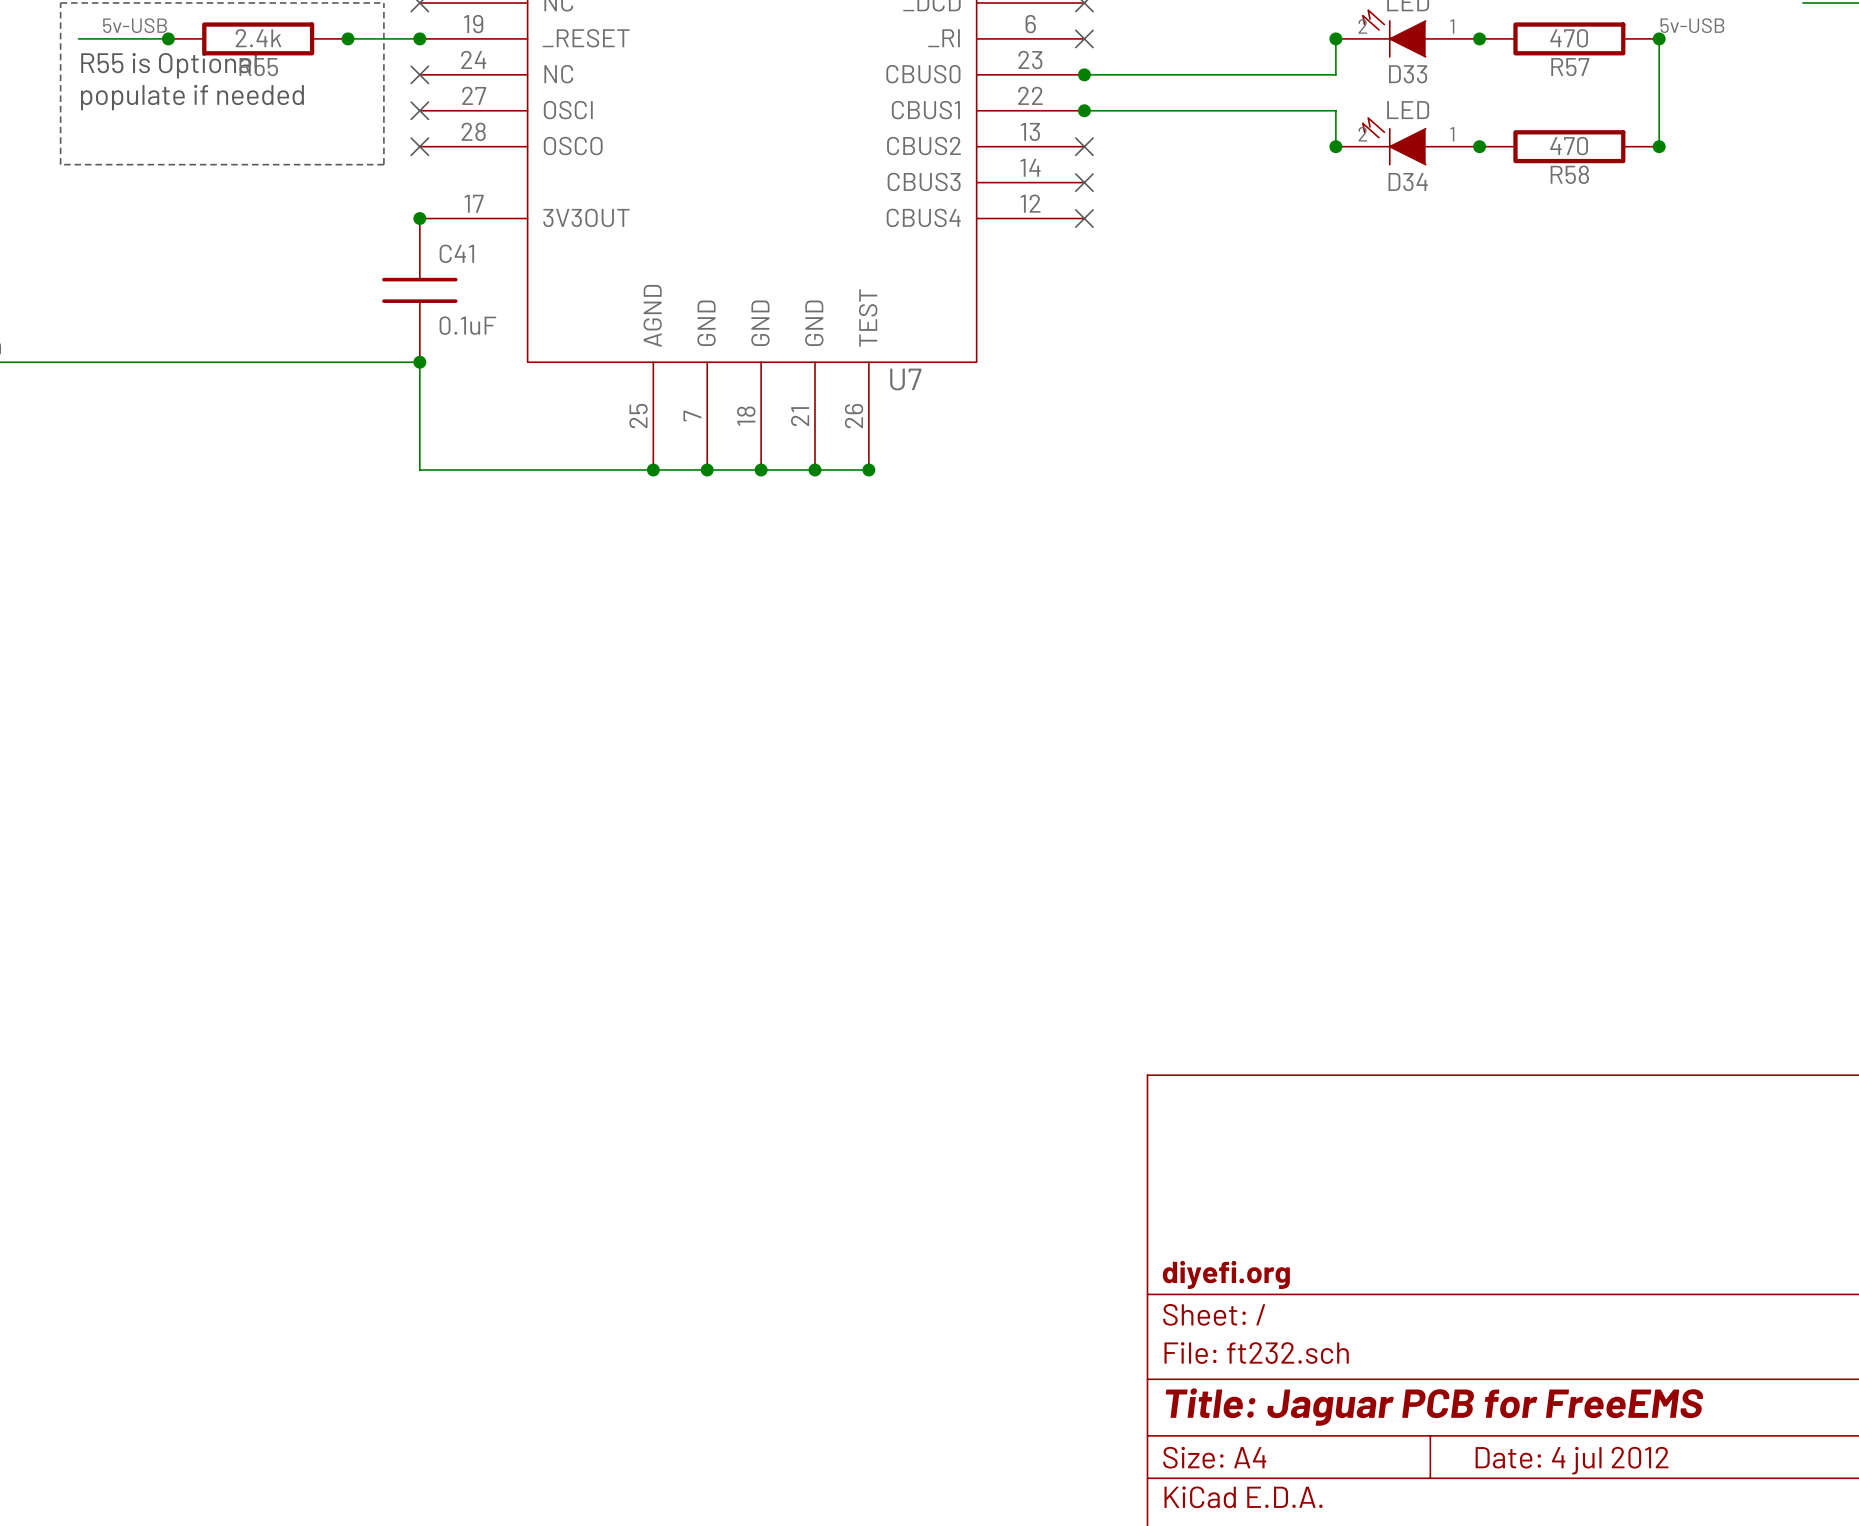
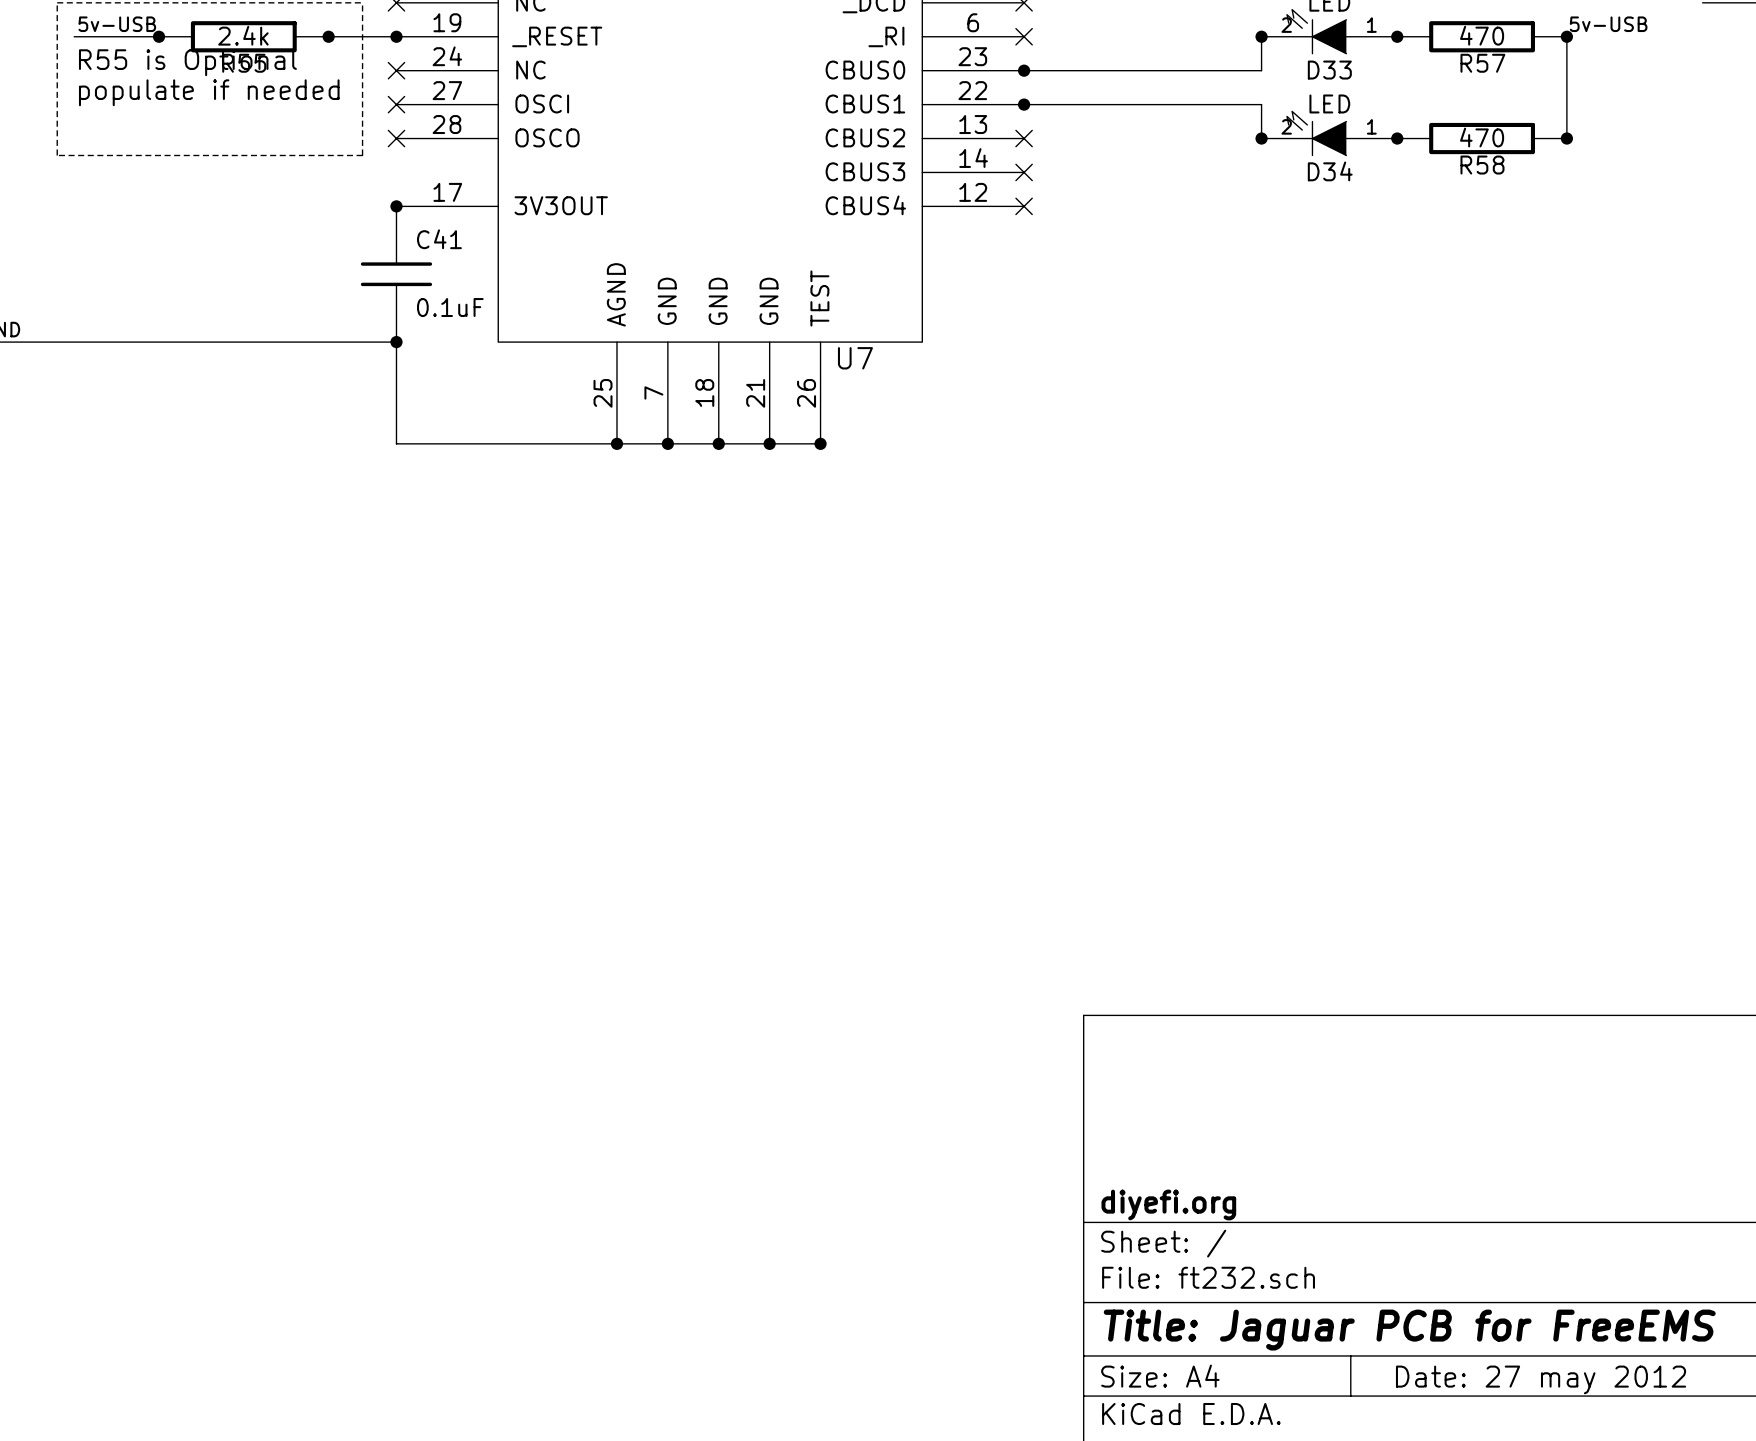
title block: Date: 4 jul 2012 (1572, 1460) -> Date: 27 may 2012 (1541, 1379)

